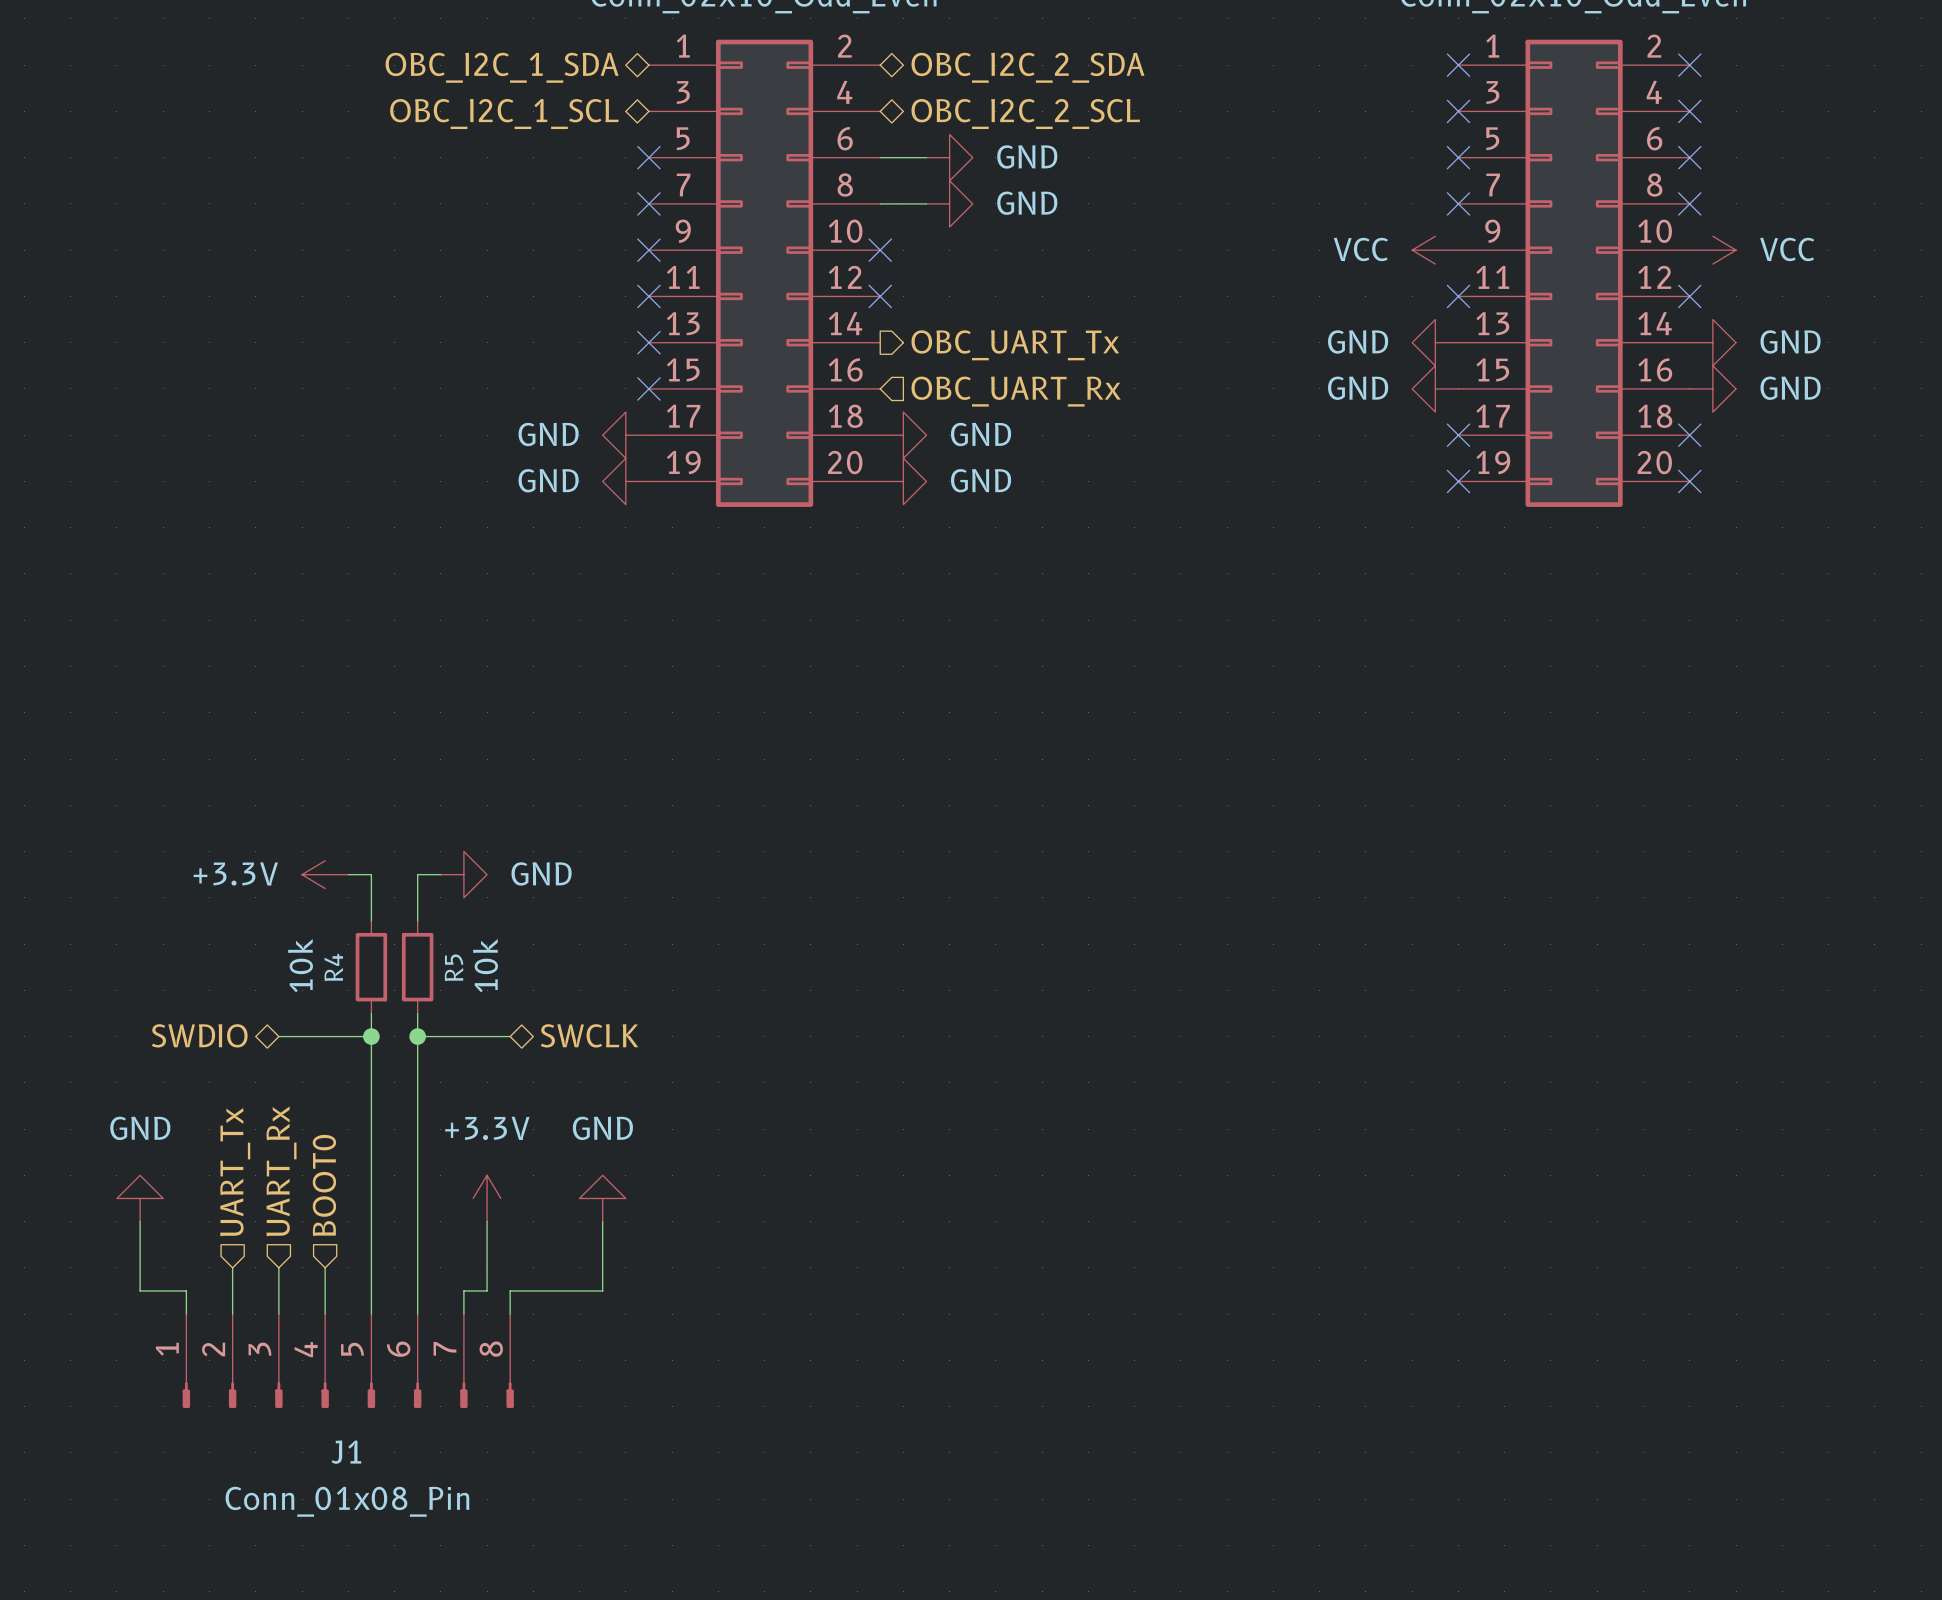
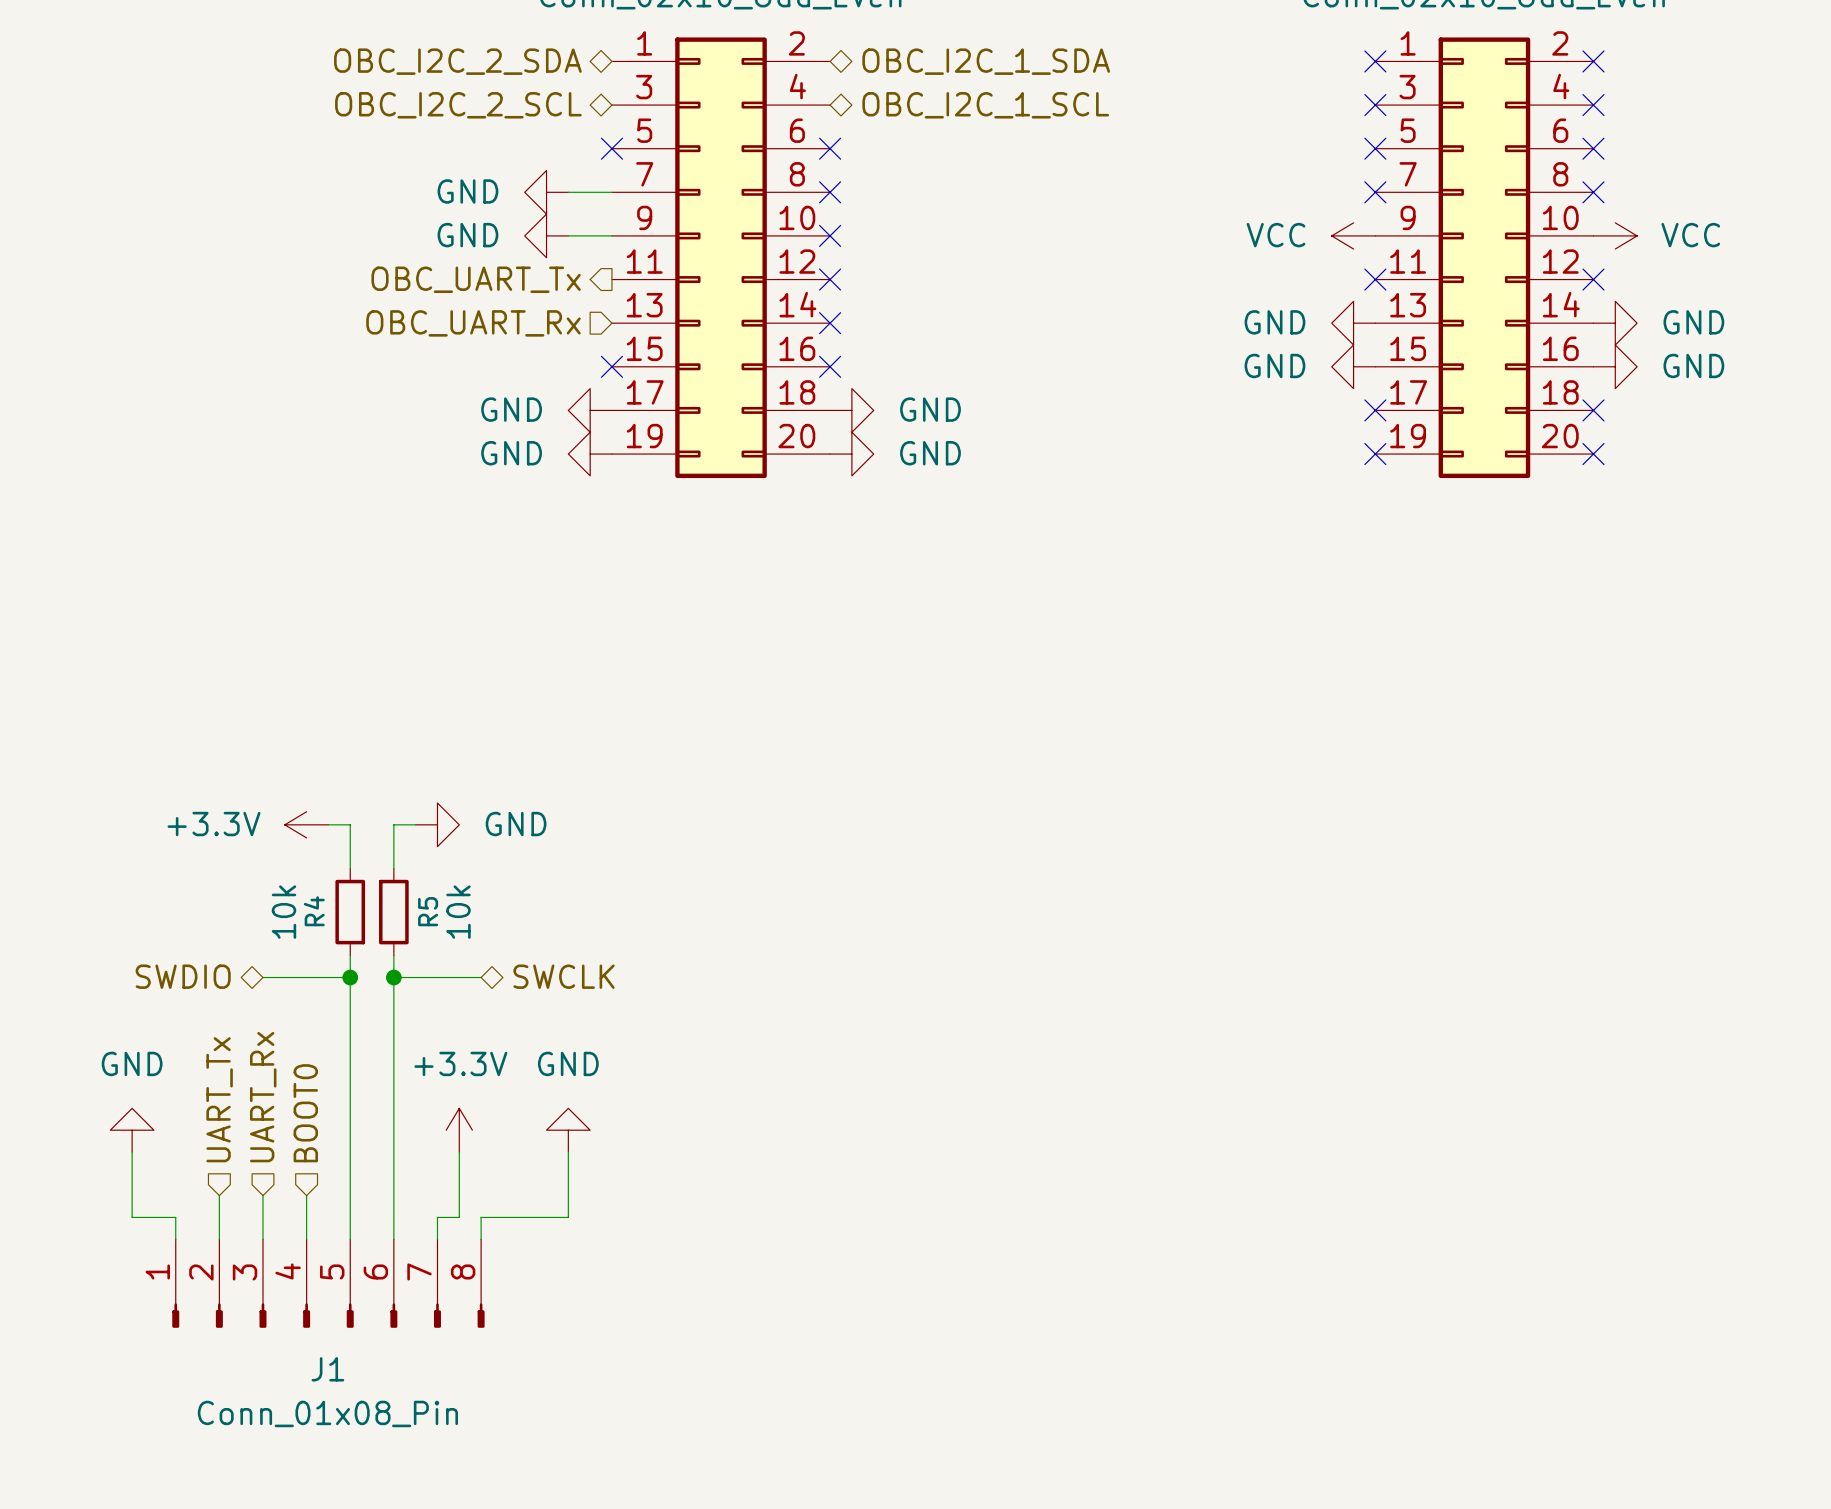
hierarchical label: OBC_I2C_1_SDA (502, 67) -> OBC_I2C_2_SDA (457, 61)
hierarchical label: OBC_I2C_2_SDA (1027, 67) -> OBC_I2C_1_SDA (986, 61)
hierarchical label: OBC_I2C_1_SCL (504, 114) -> OBC_I2C_2_SCL (458, 105)
hierarchical label: OBC_I2C_2_SCL (1025, 114) -> OBC_I2C_1_SCL (985, 105)
wire: (880, 157) (926, 157) -> (568, 192) (611, 192)
no-connect mark: none -> (830, 148)
power symbol: GND (949, 157) -> none
power symbol: none -> GND (546, 192)
no-connect mark: (648, 203) -> none
wire: (880, 203) (926, 203) -> (568, 235) (611, 235)
no-connect mark: none -> (830, 192)
power symbol: GND (949, 203) -> none
power symbol: none -> GND (546, 235)
no-connect mark: (648, 250) -> none
no-connect mark: (648, 296) -> none
no-connect mark: (648, 342) -> none
no-connect mark: none -> (830, 323)
hierarchical label rotation: 0° (1015, 345) -> 180° (476, 279)
hierarchical label position: OBC_UART_Tx (1015, 345) -> OBC_UART_Tx (476, 279)
no-connect mark: none -> (830, 366)
hierarchical label rotation: 0° (1016, 391) -> 180° (473, 323)
hierarchical label position: OBC_UART_Rx (1016, 391) -> OBC_UART_Rx (473, 323)

